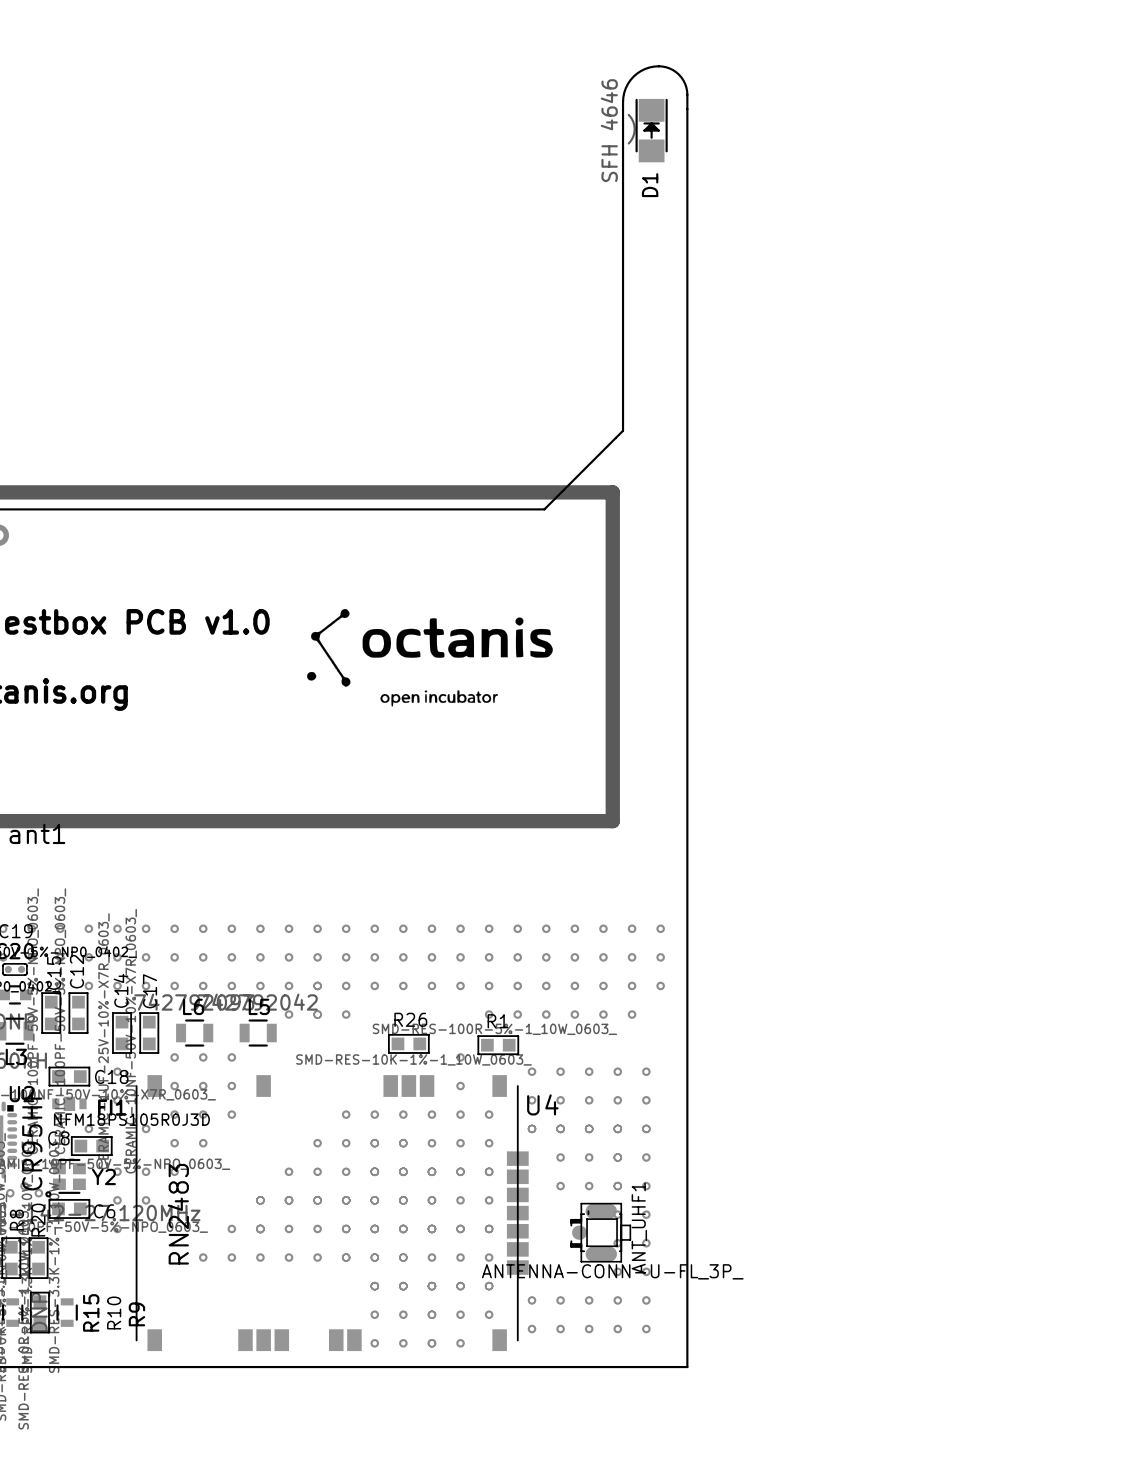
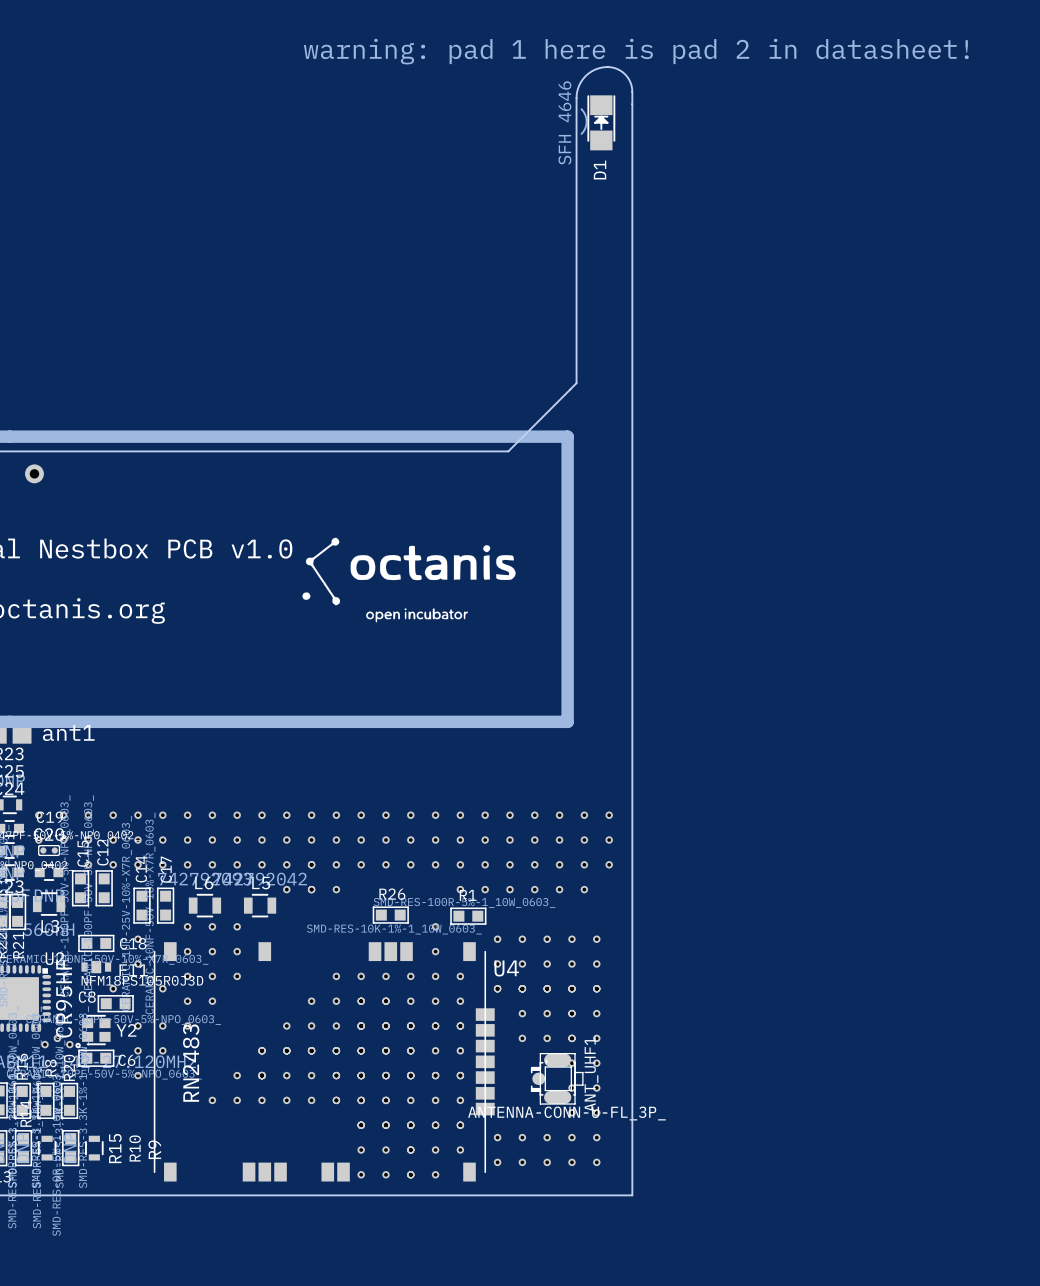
text: none -> warning: pad 1 here is pad 2 in datasheet! (636, 51)

